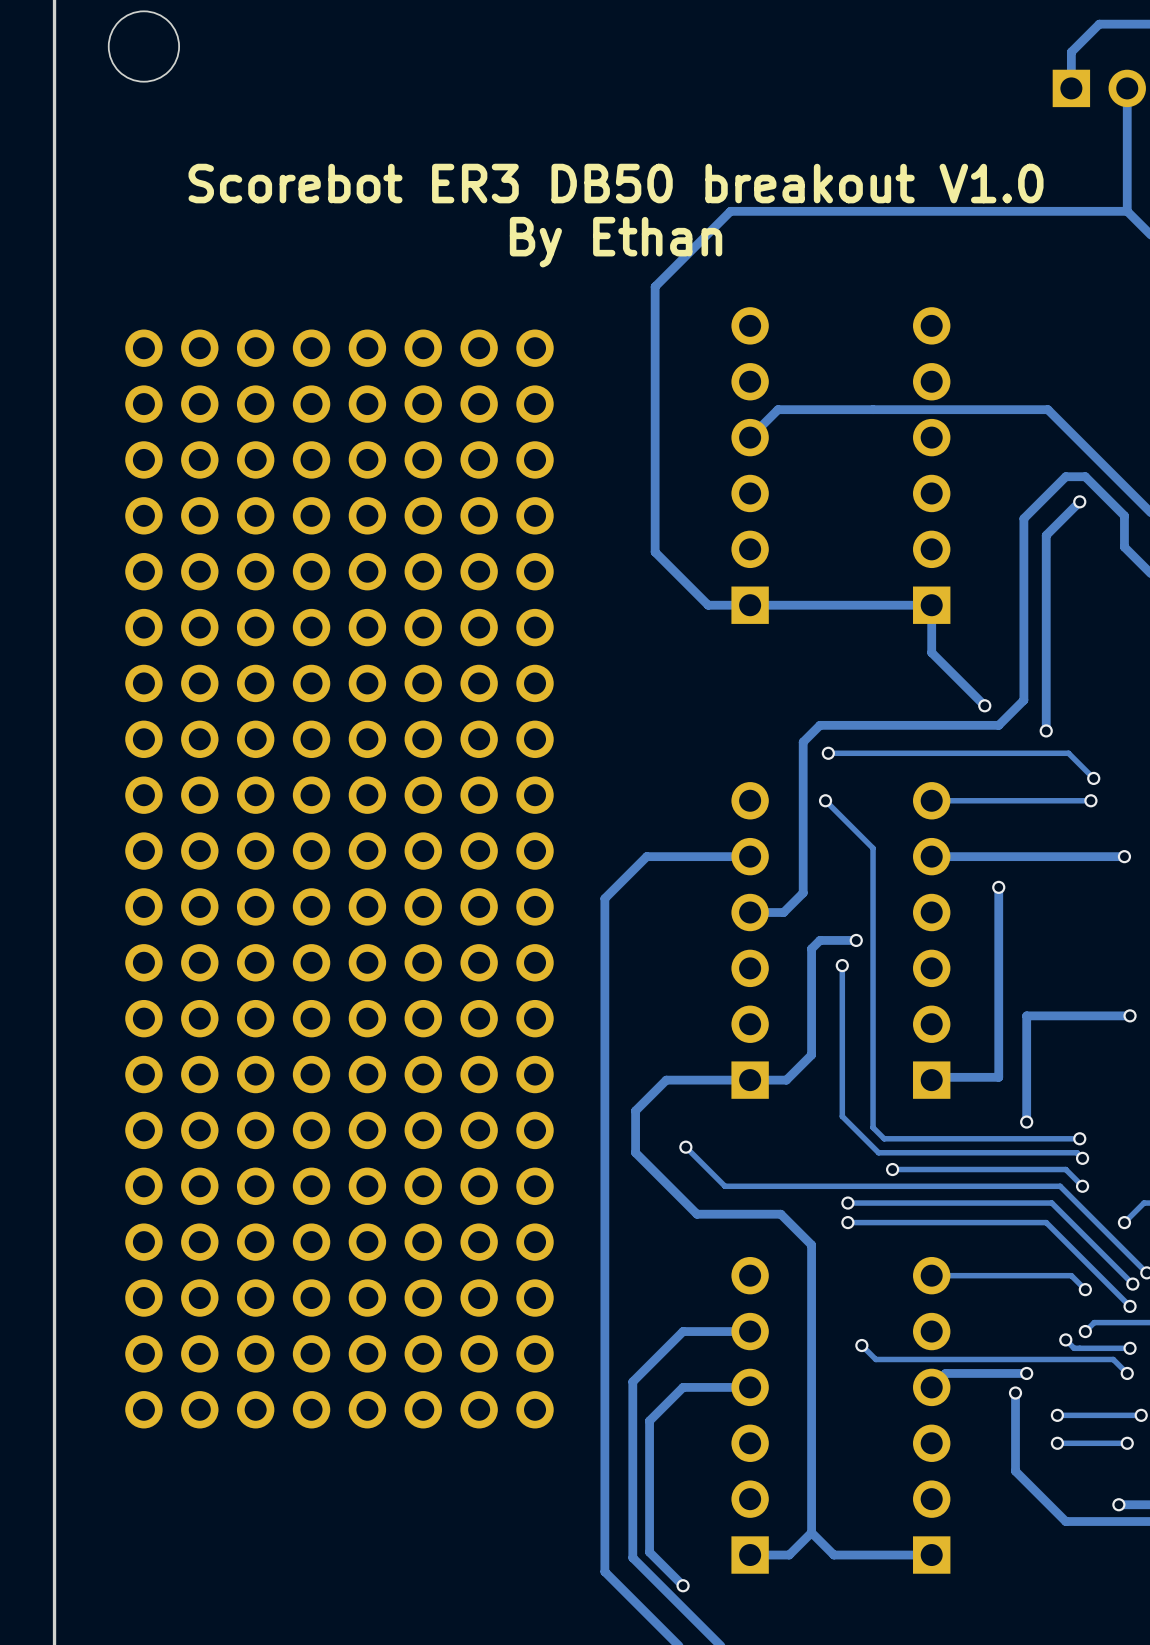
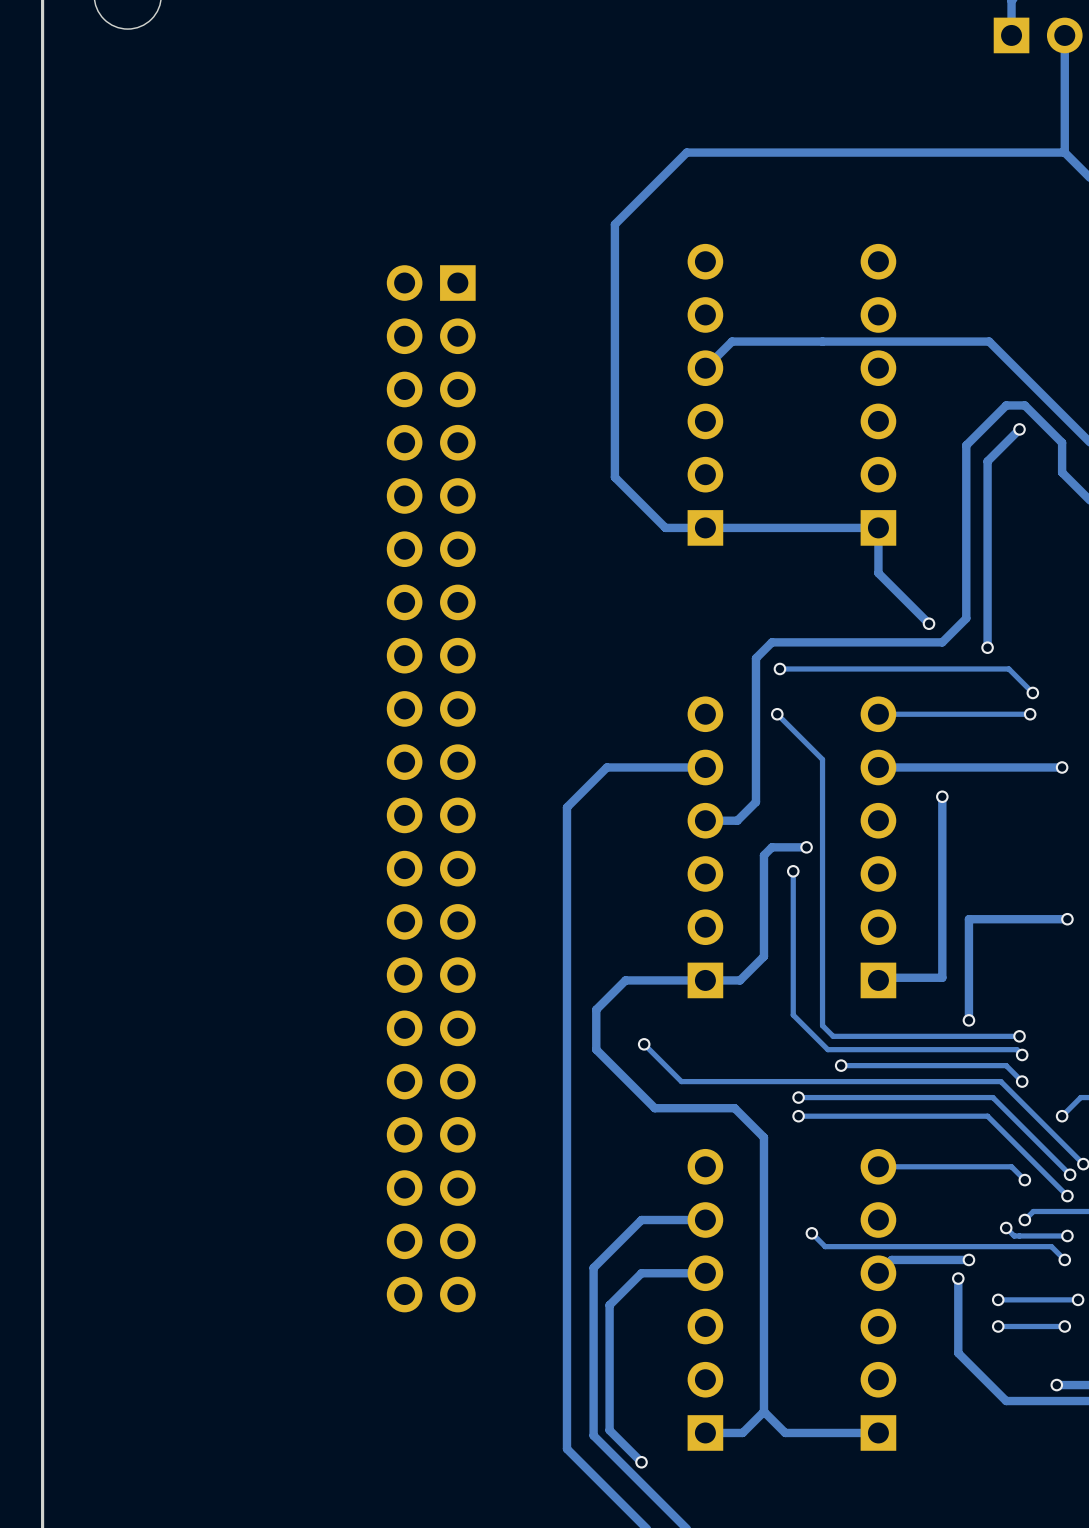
text: Scorebot ER3 DB50 breakout V1.0 (616, 183) -> none
text: By Ethan (616, 242) -> none
part: (171, 878) -> none
part: (283, 878) -> none
part: (395, 878) -> none
part: none -> (431, 788)
part: (507, 878) -> none

